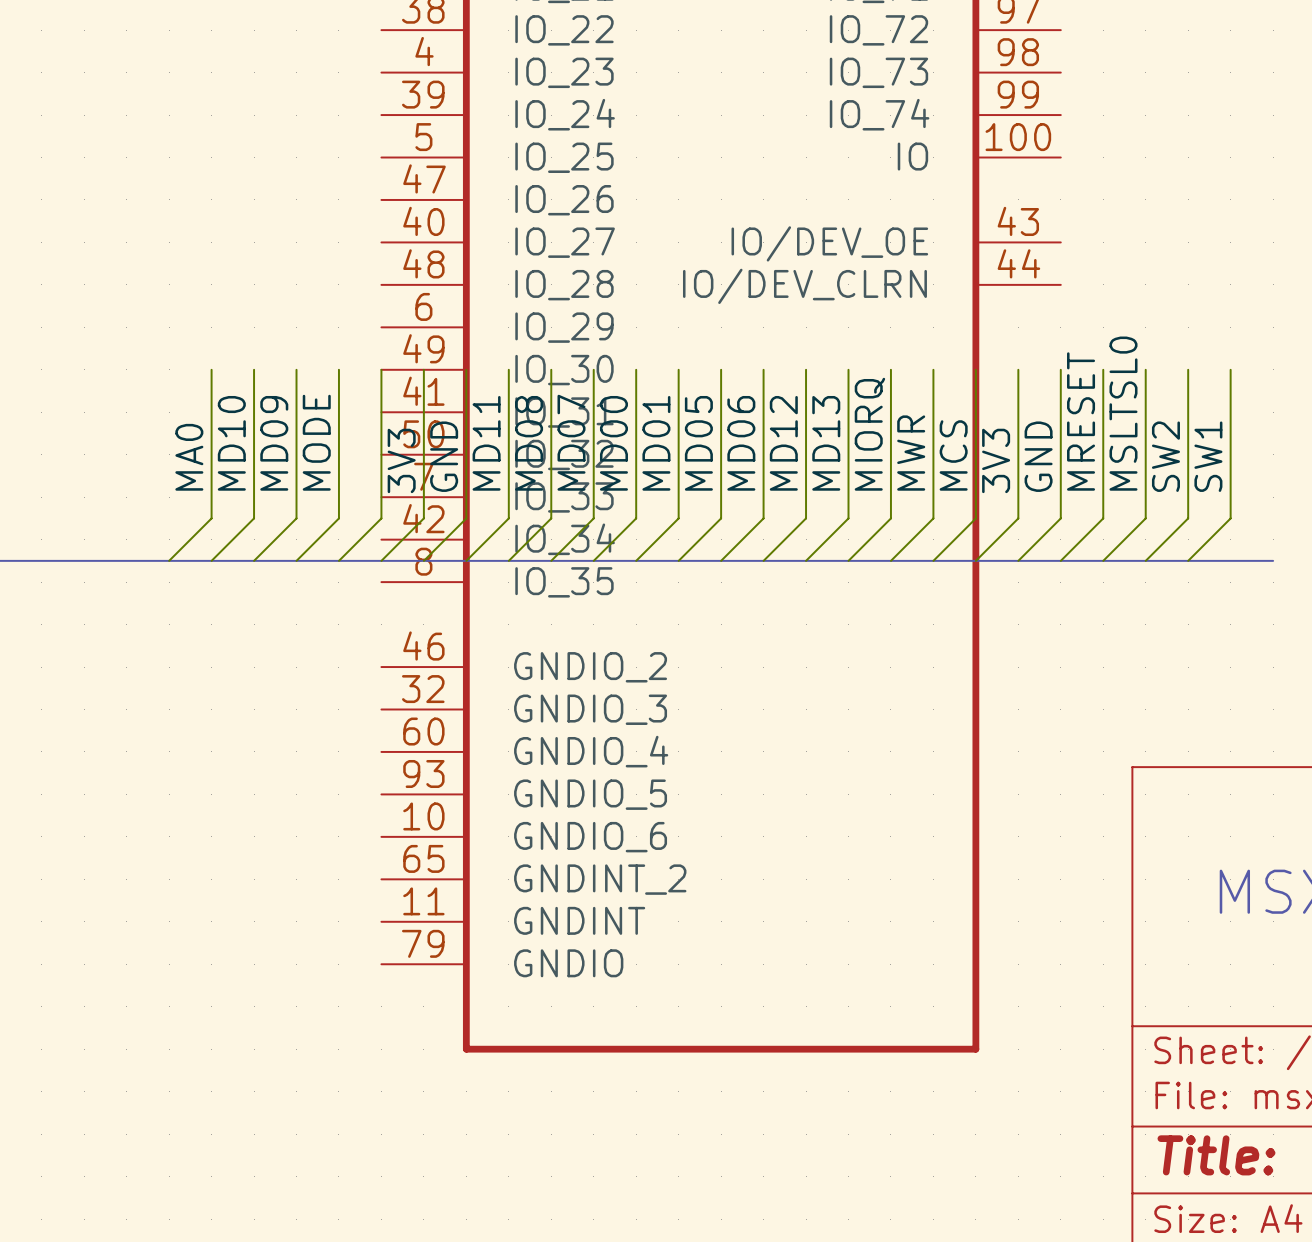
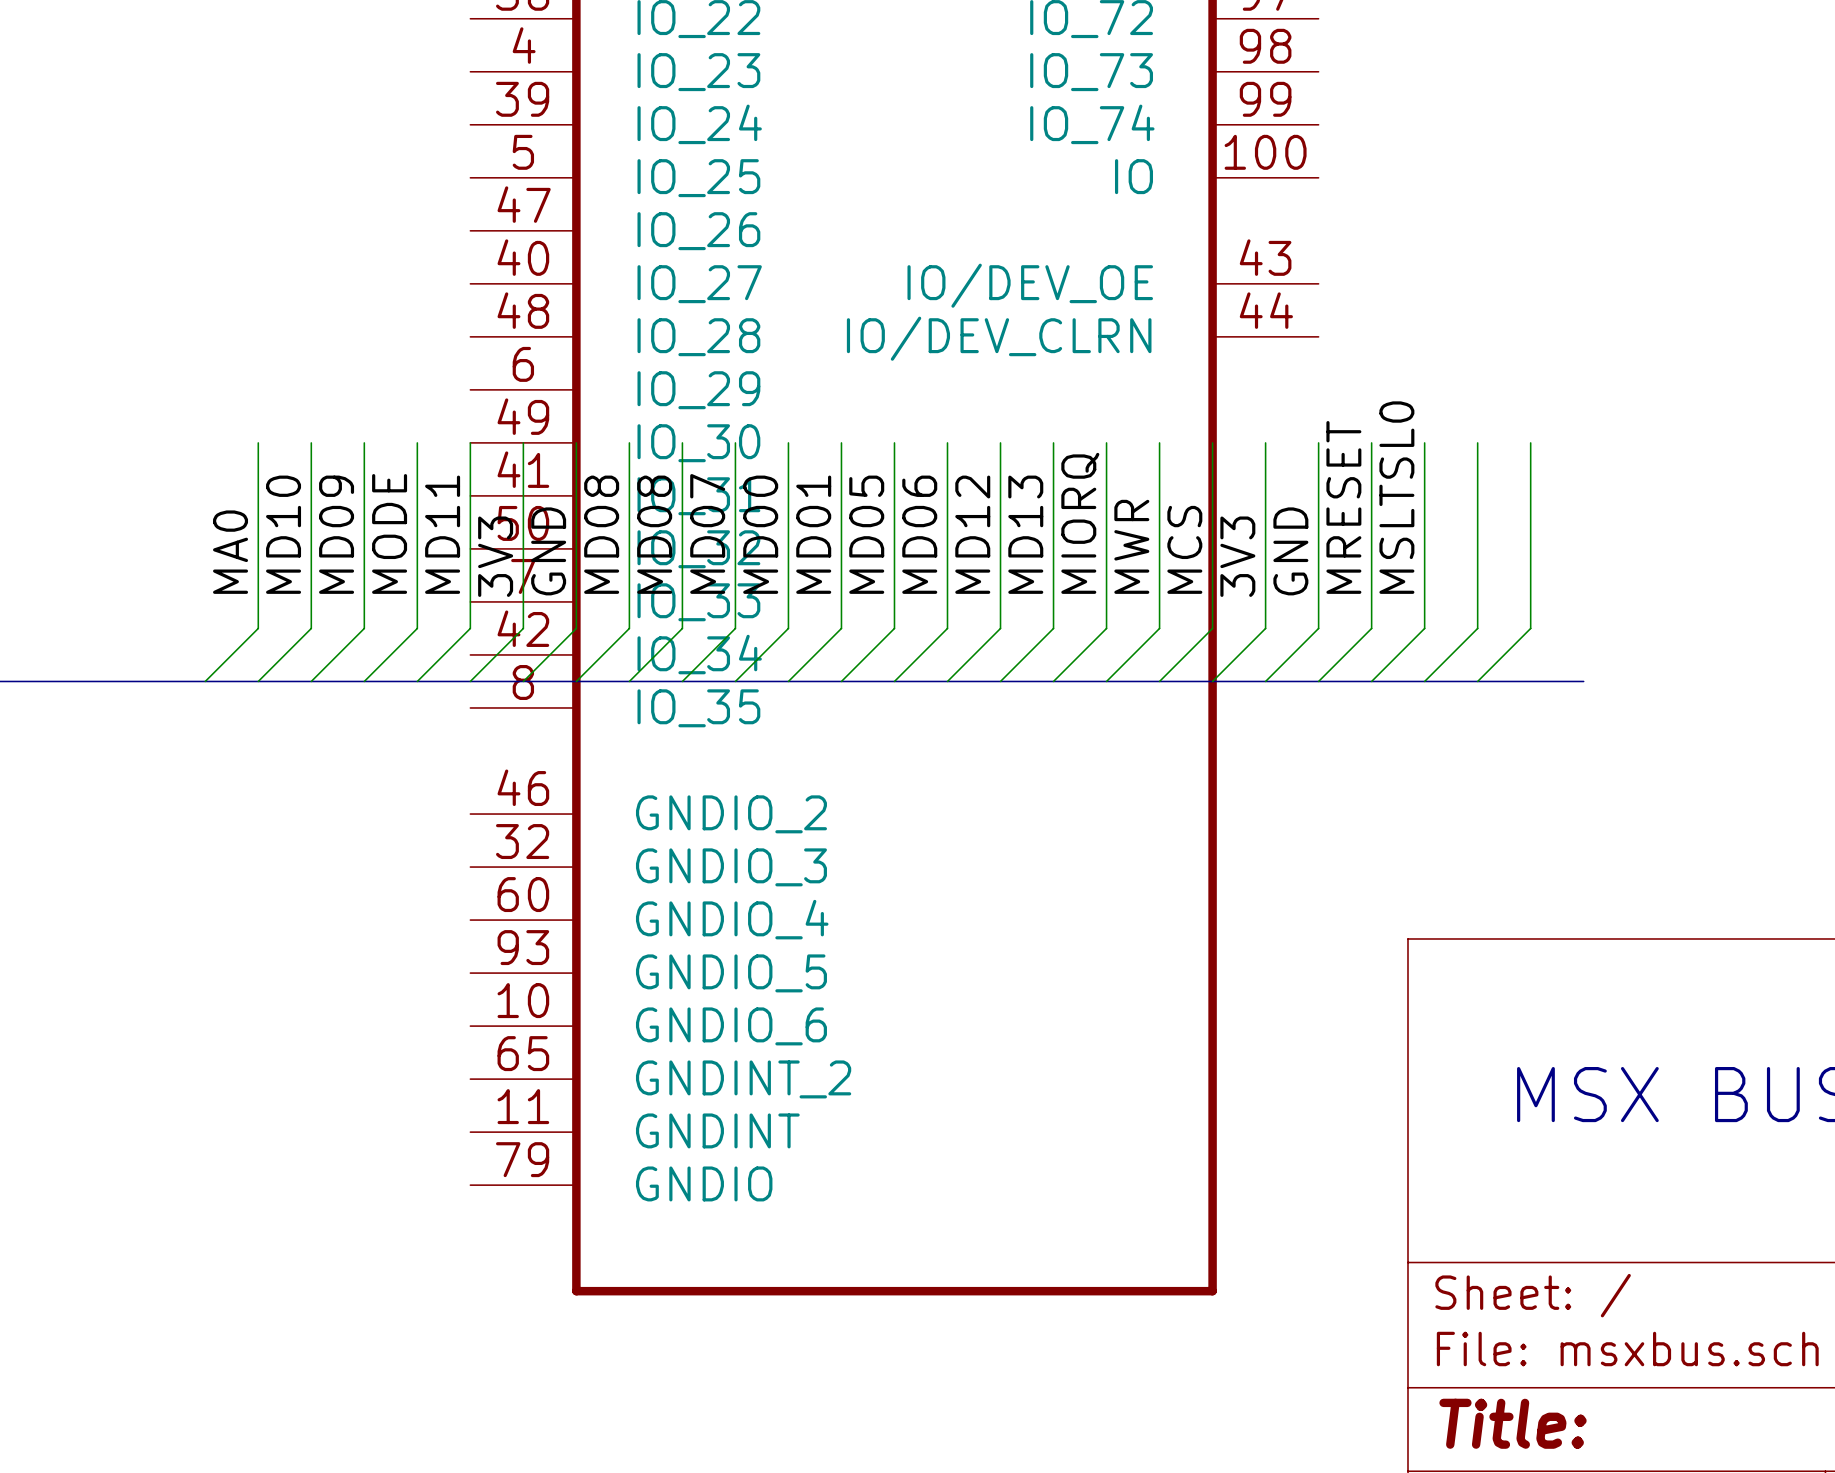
label: none -> MD11 (442, 534)
label: MD11 (486, 443) -> MD08 (601, 534)
label: SW2 (1165, 456) -> none
label: SW1 (1208, 456) -> none

